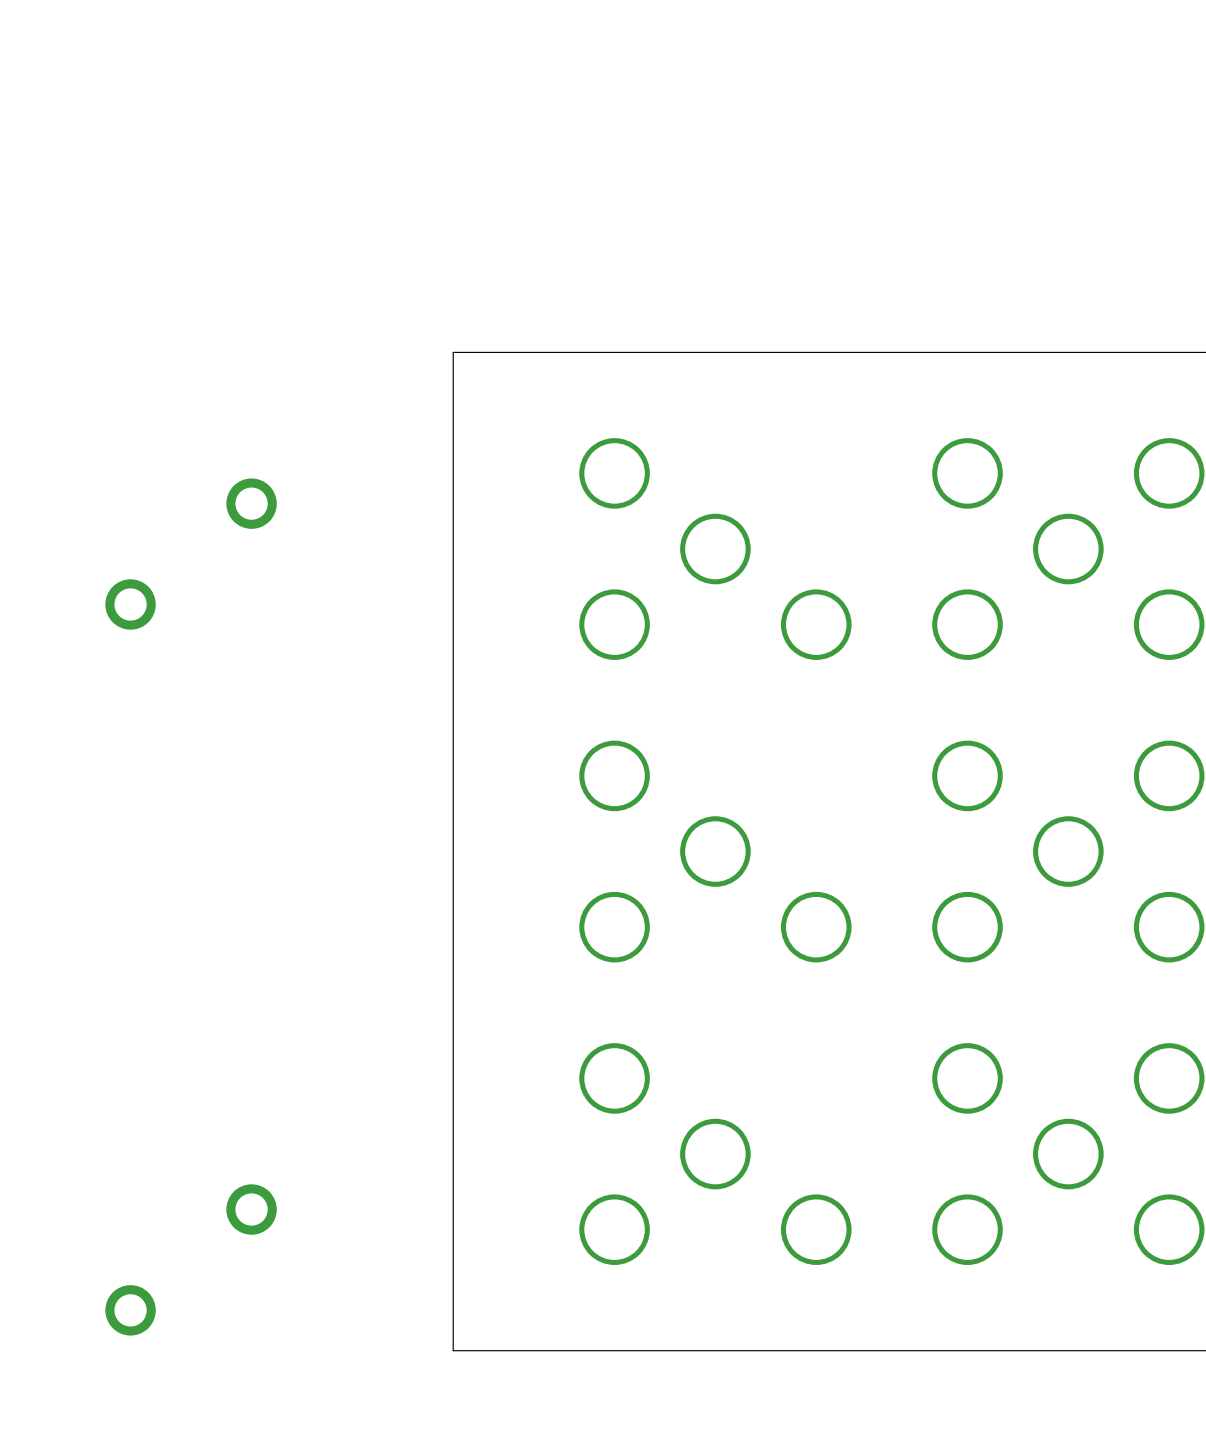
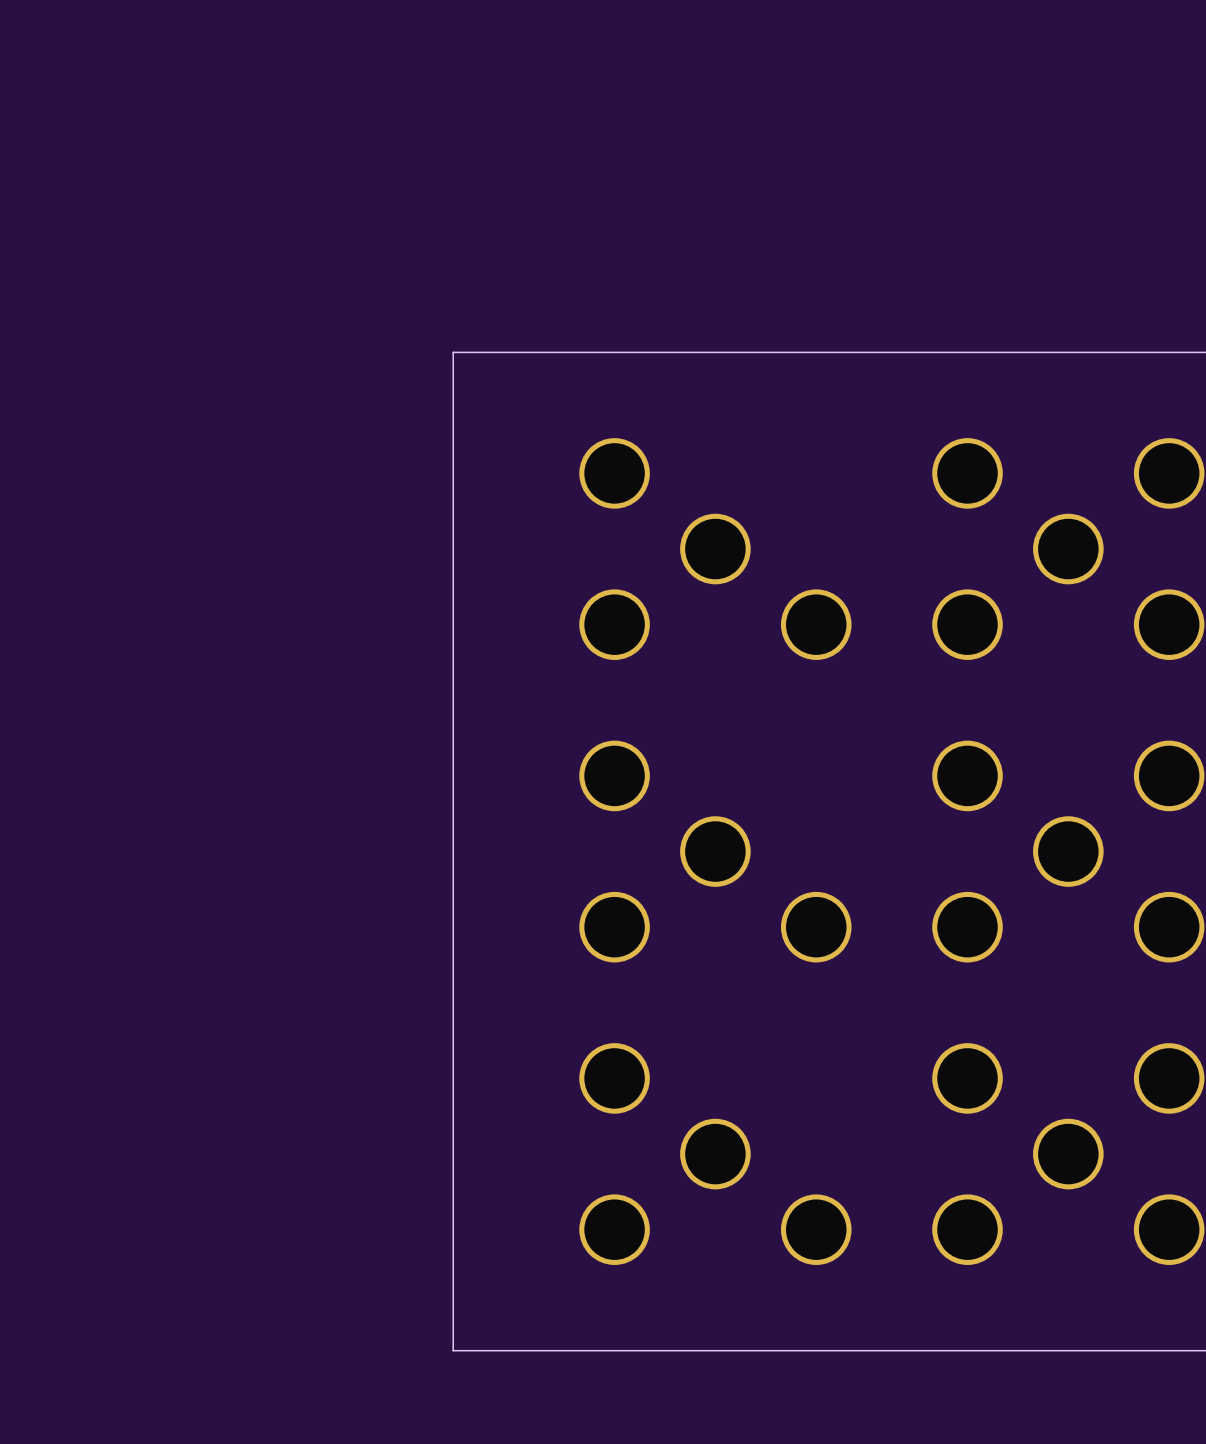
part: (251, 503) -> none
part: (130, 604) -> none
part: (251, 1209) -> none
part: (130, 1310) -> none

